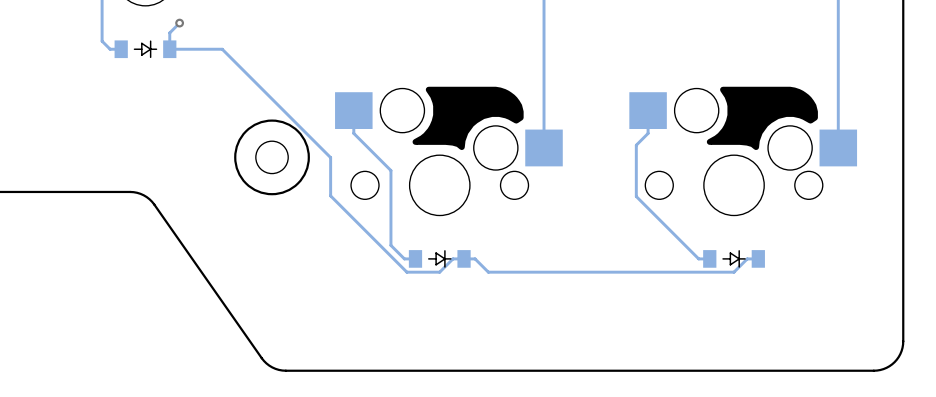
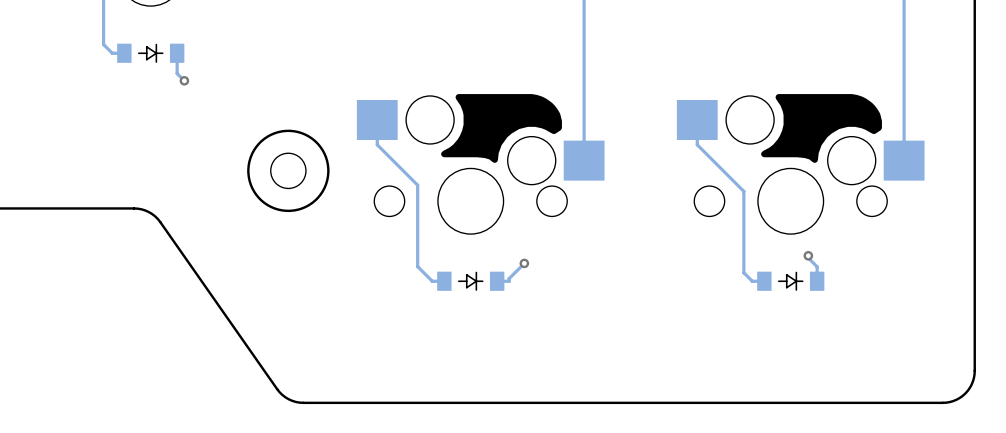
track: (179, 23) (169, 32) (169, 49) (222, 49) (330, 157) (330, 195) (406, 272) (439, 272) (452, 258) (464, 258) -> none
via position: (179, 23) -> (184, 80)
track: none -> (177, 53) (177, 73) (184, 80)
track: (648, 133) (636, 145) (636, 196) (690, 251) -> (697, 144) (743, 191) (743, 272)
track: none -> (808, 255) (817, 266) (817, 281)
via: none -> (808, 255)
via: none -> (524, 263)
track: (758, 258) (747, 258) (734, 272) (488, 272) (475, 258) -> (524, 263) (509, 278) (509, 281)

